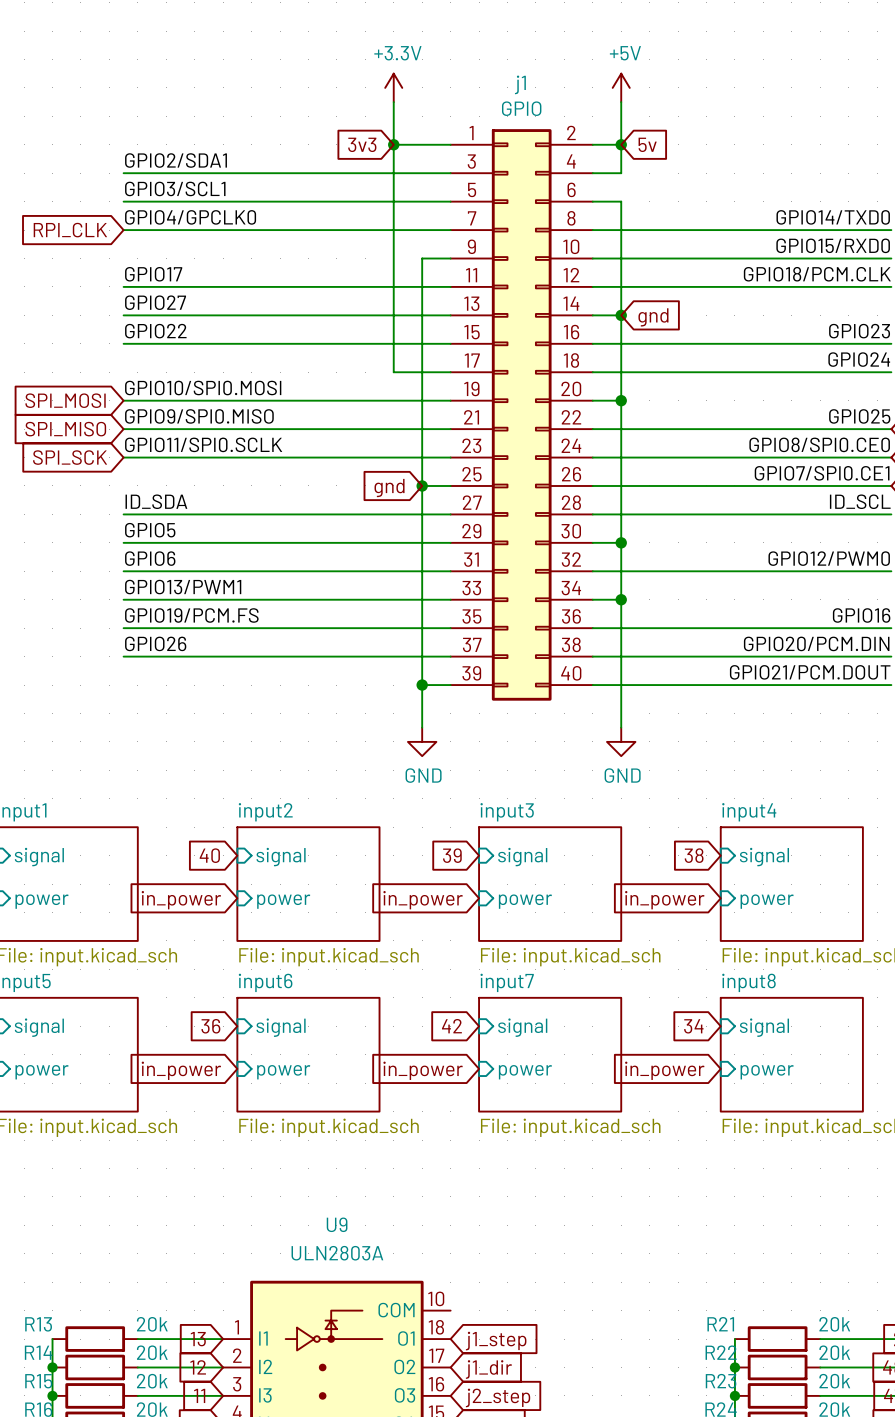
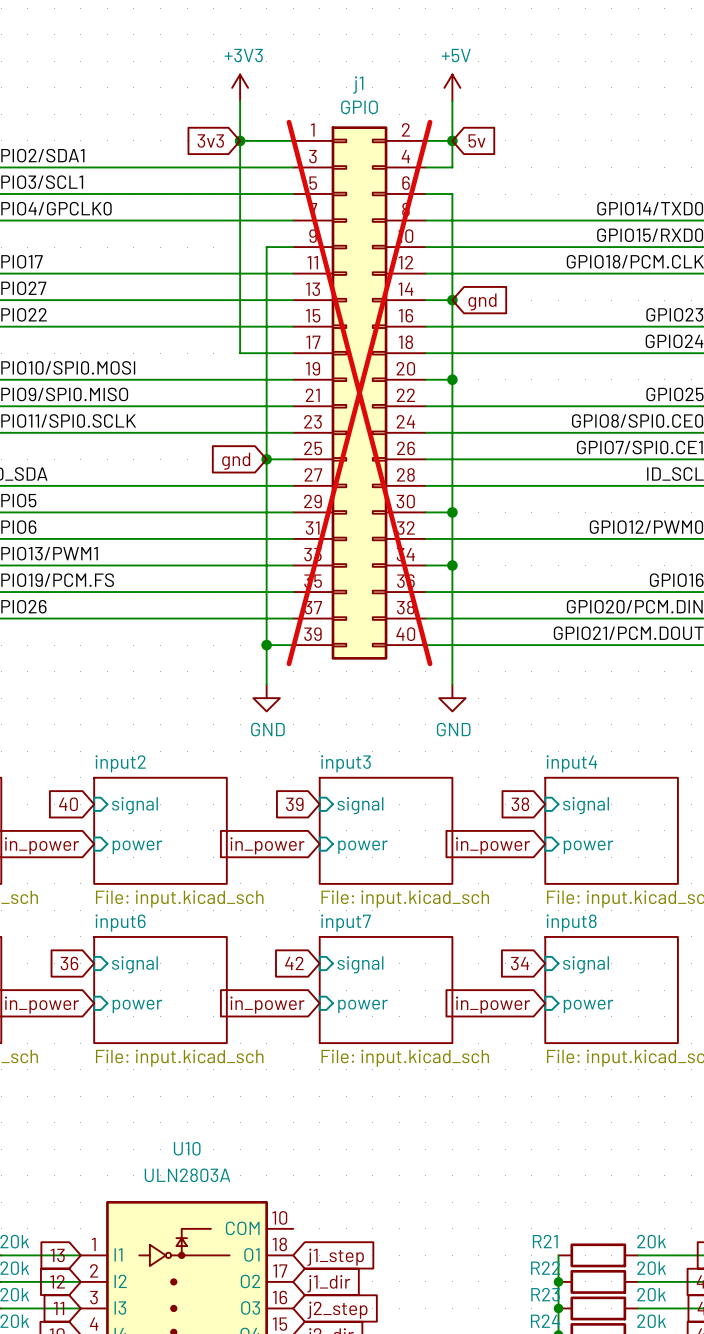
power symbol: +3.3V (393, 87) -> +3V3 (240, 87)
j1 do-not-place cross: none -> (359, 393)
U9 name: U9 (337, 1224) -> U10 (187, 1148)

